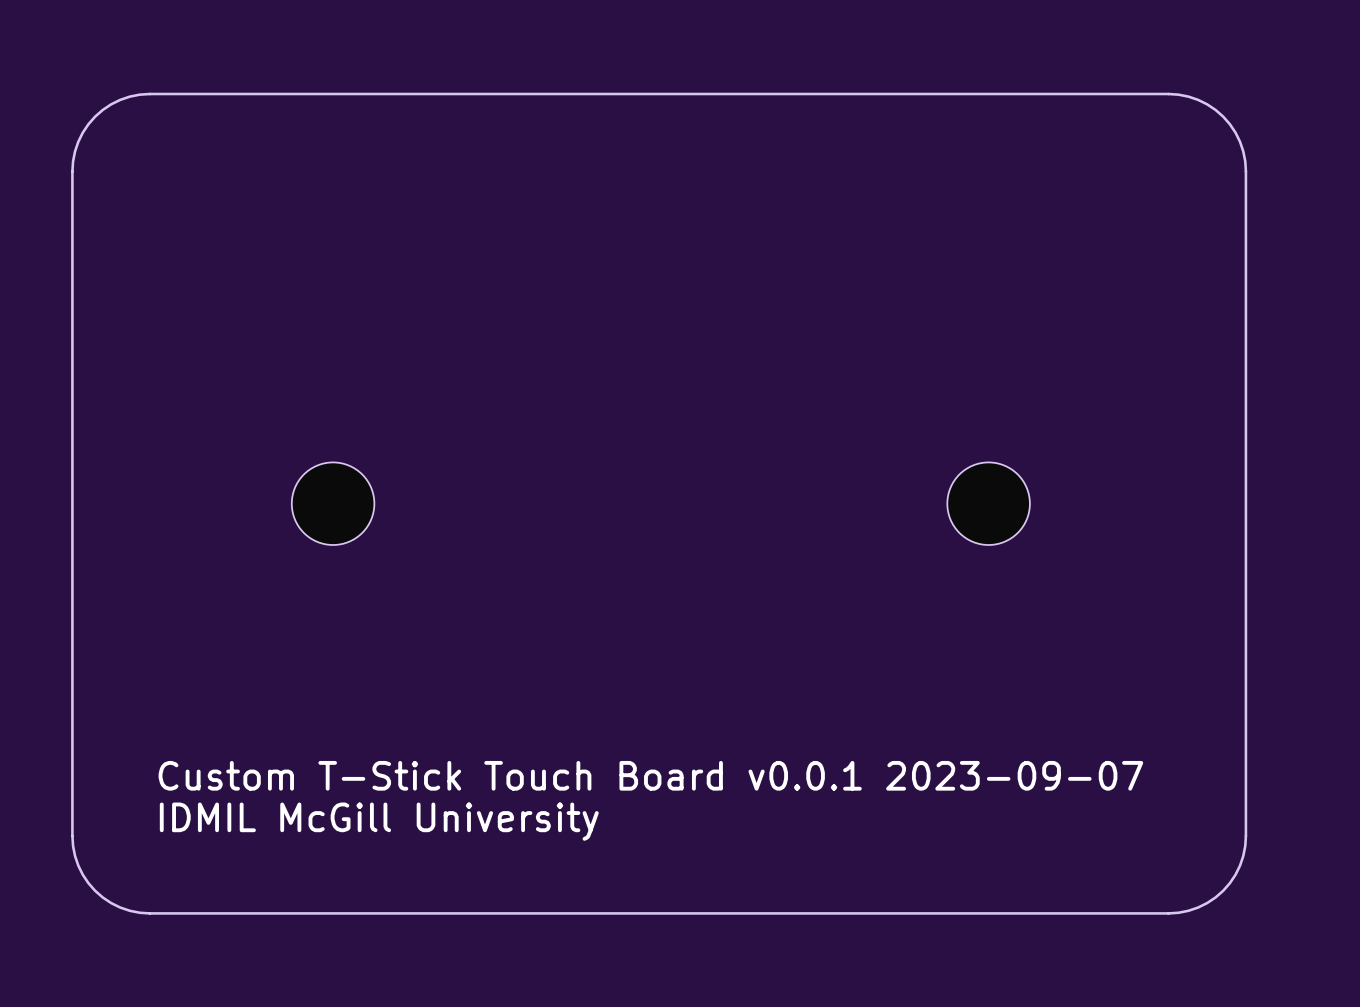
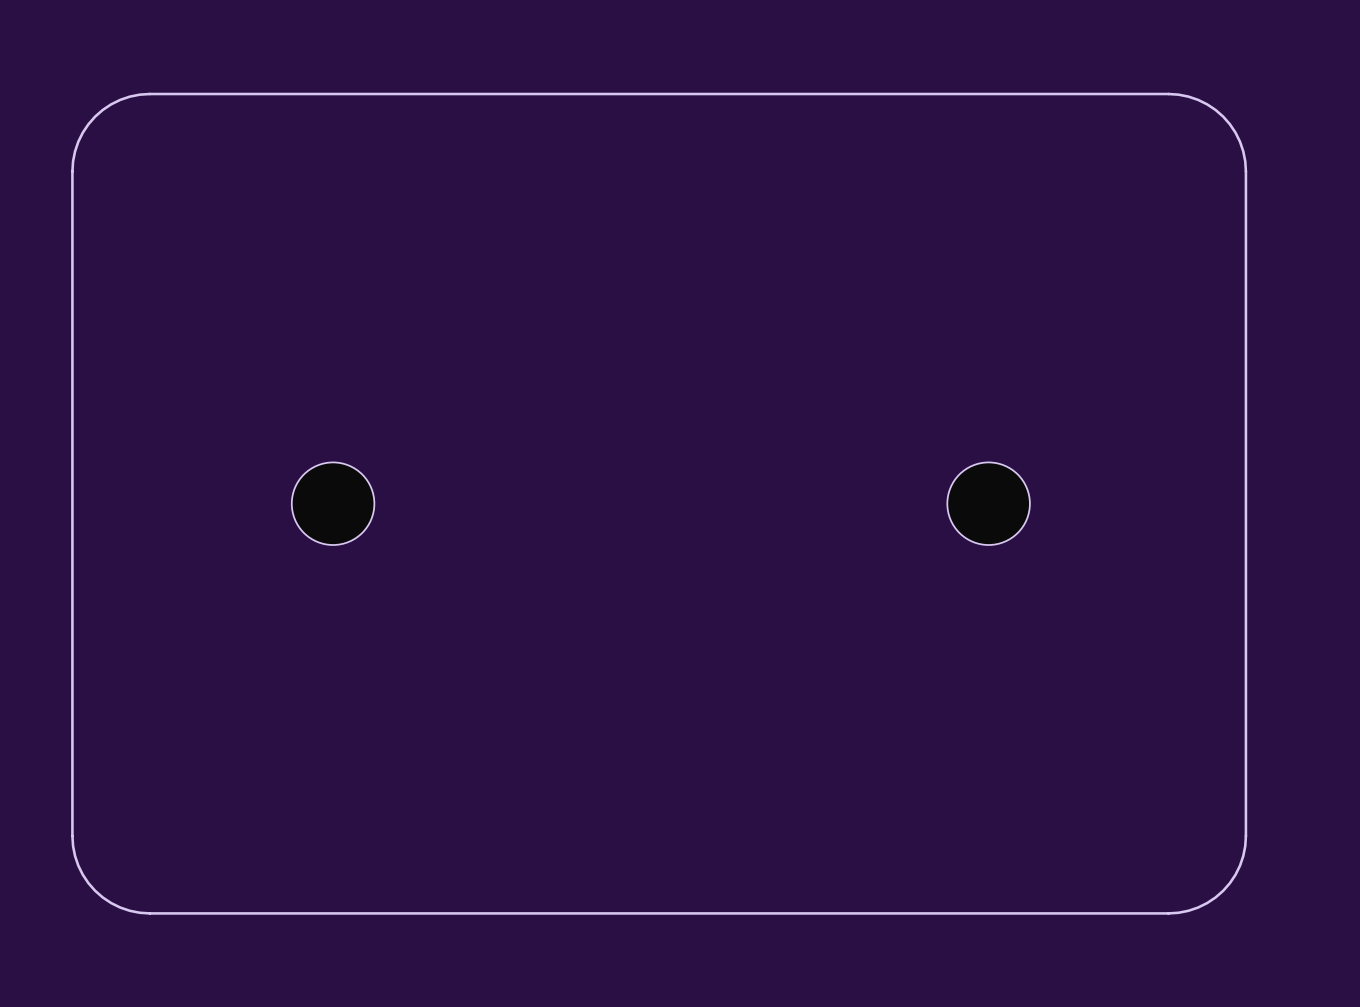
text: Custom T-Stick Touch Board v0.0.1 2023-09-07 (650, 775) -> none
text: IDMIL McGill University (379, 821) -> none

